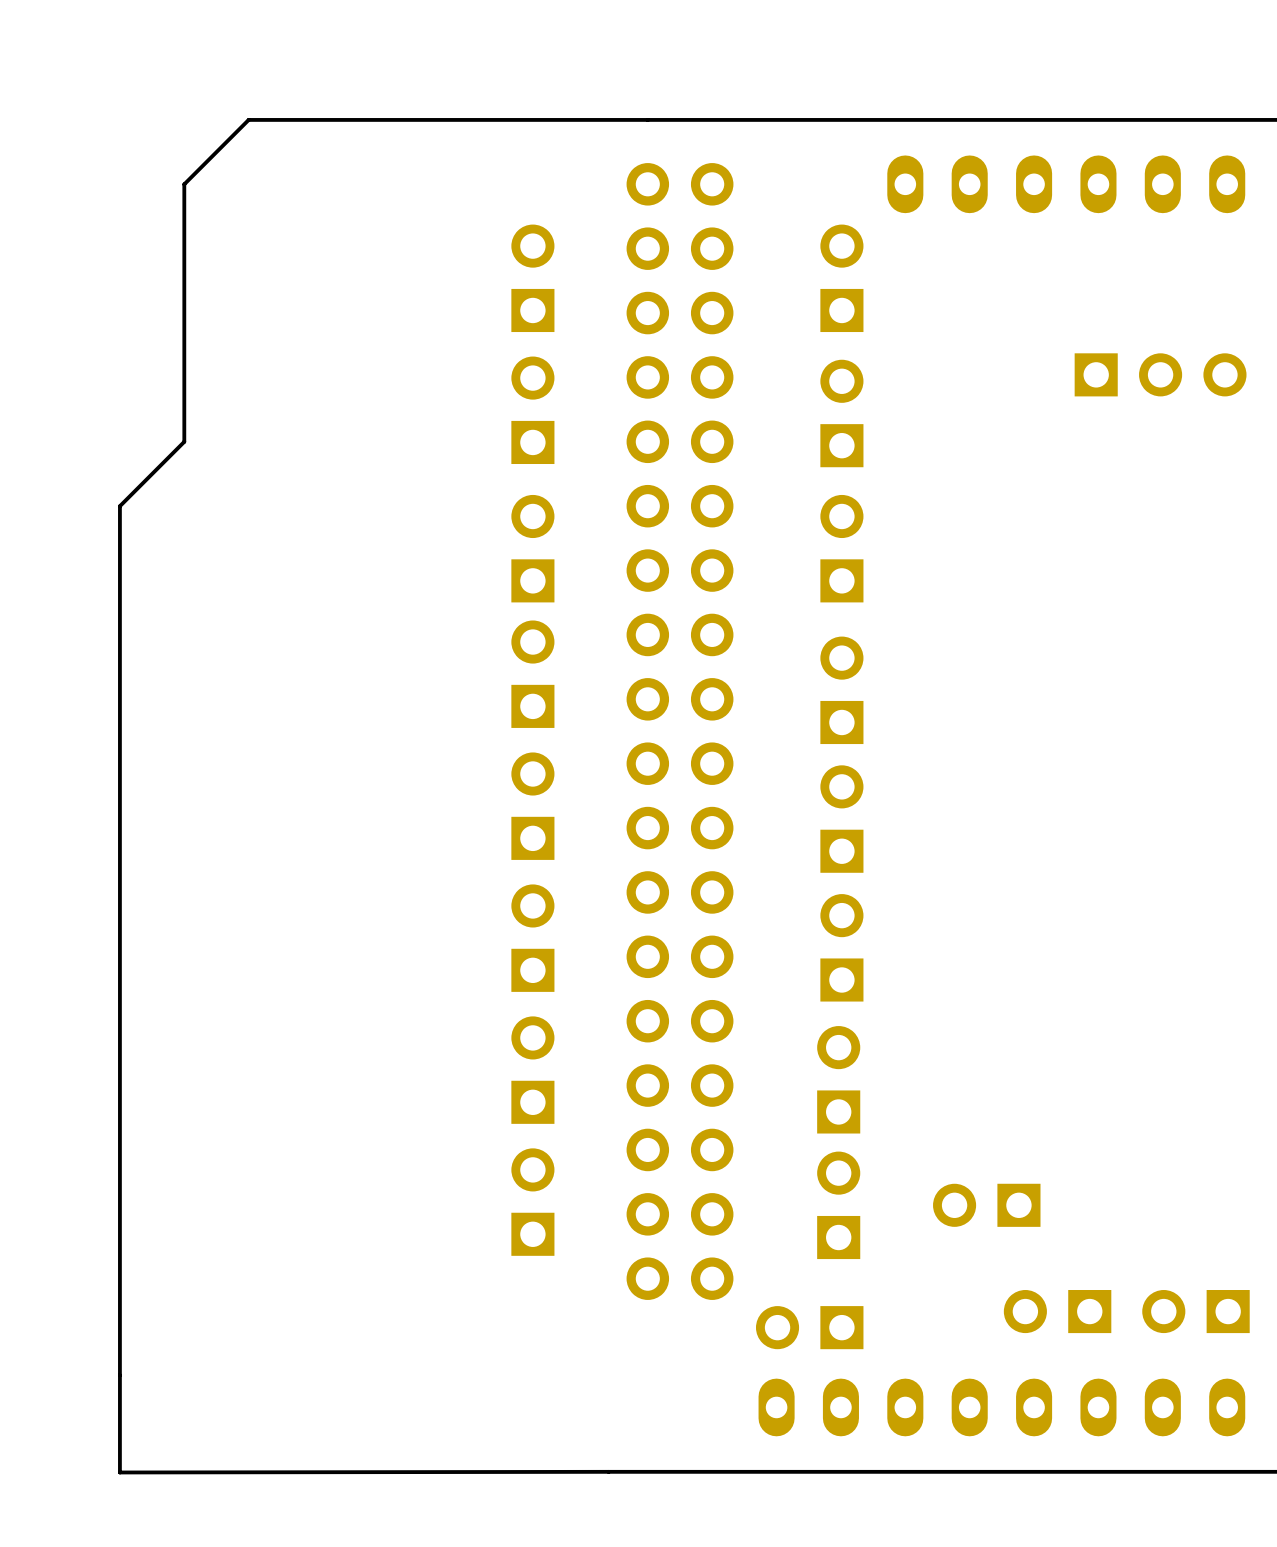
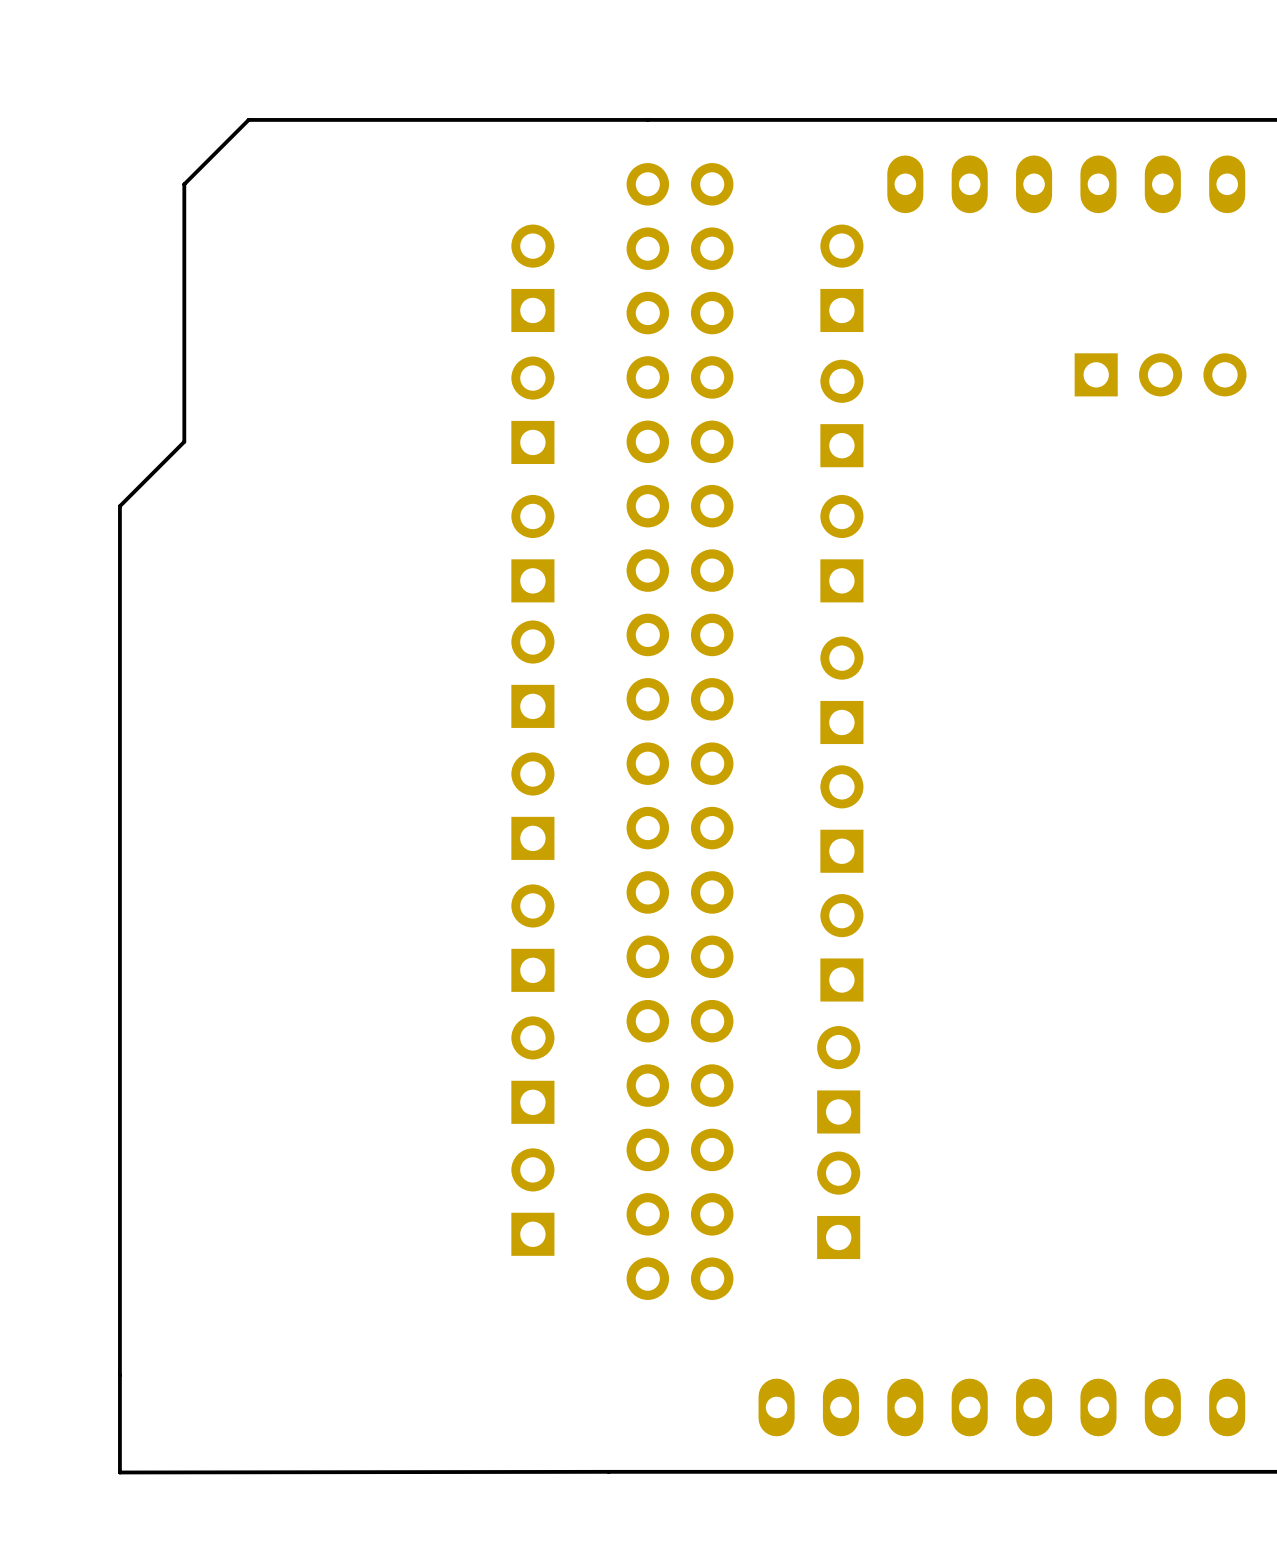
part: (986, 1205) -> none
part: (1057, 1311) -> none
part: (1195, 1311) -> none
part: (809, 1327) -> none

